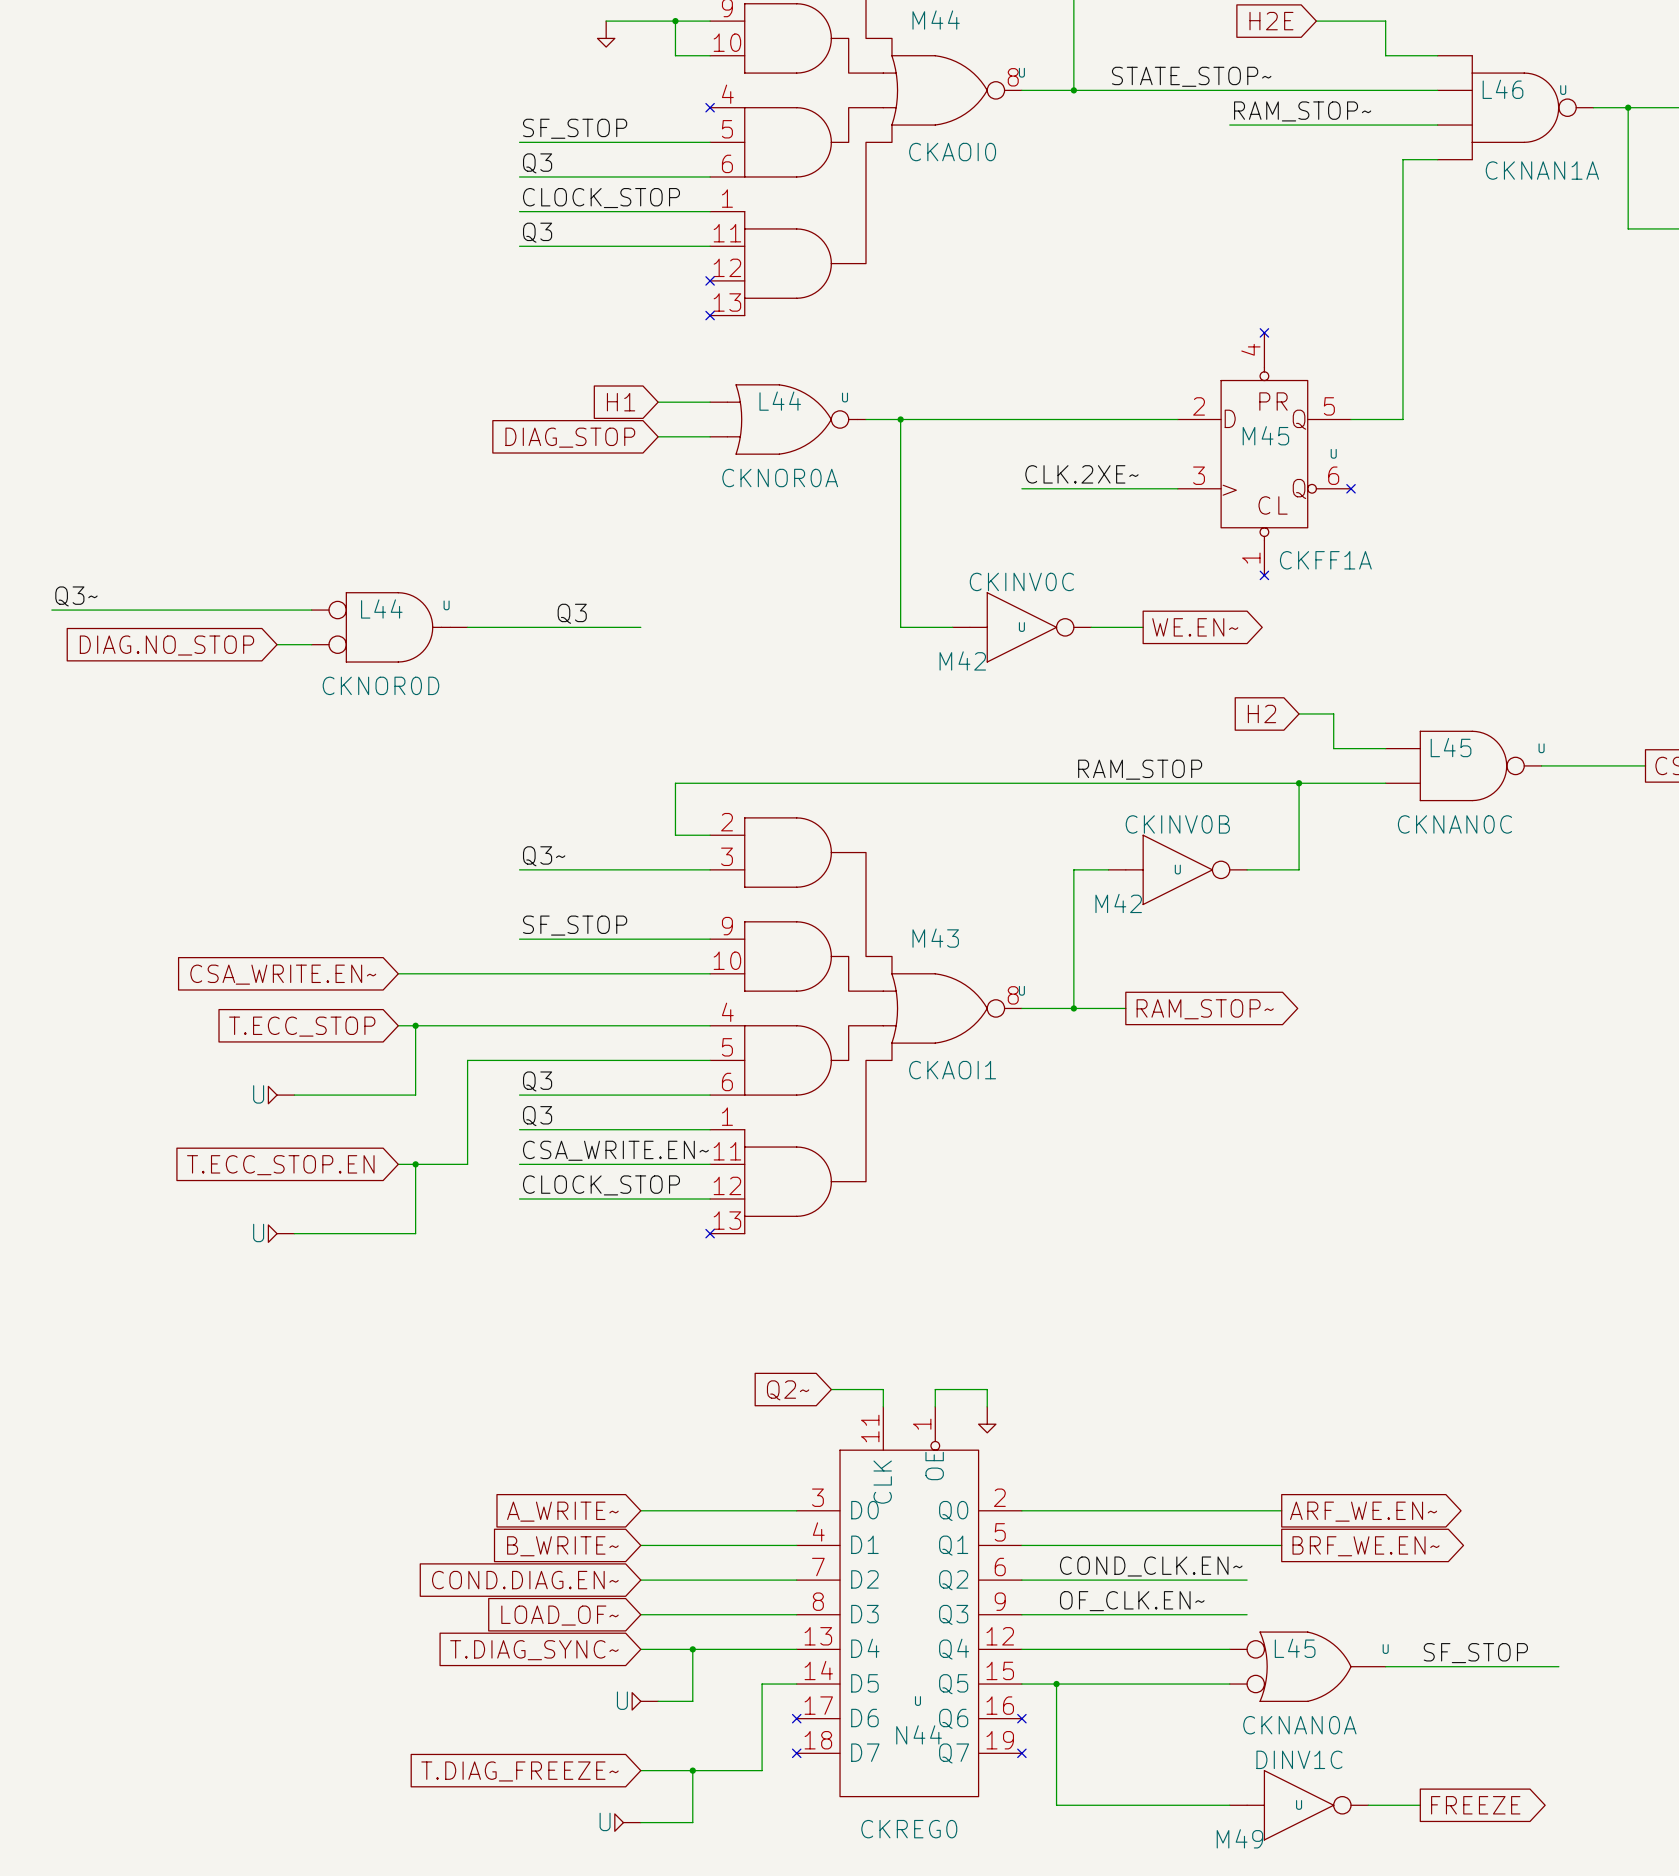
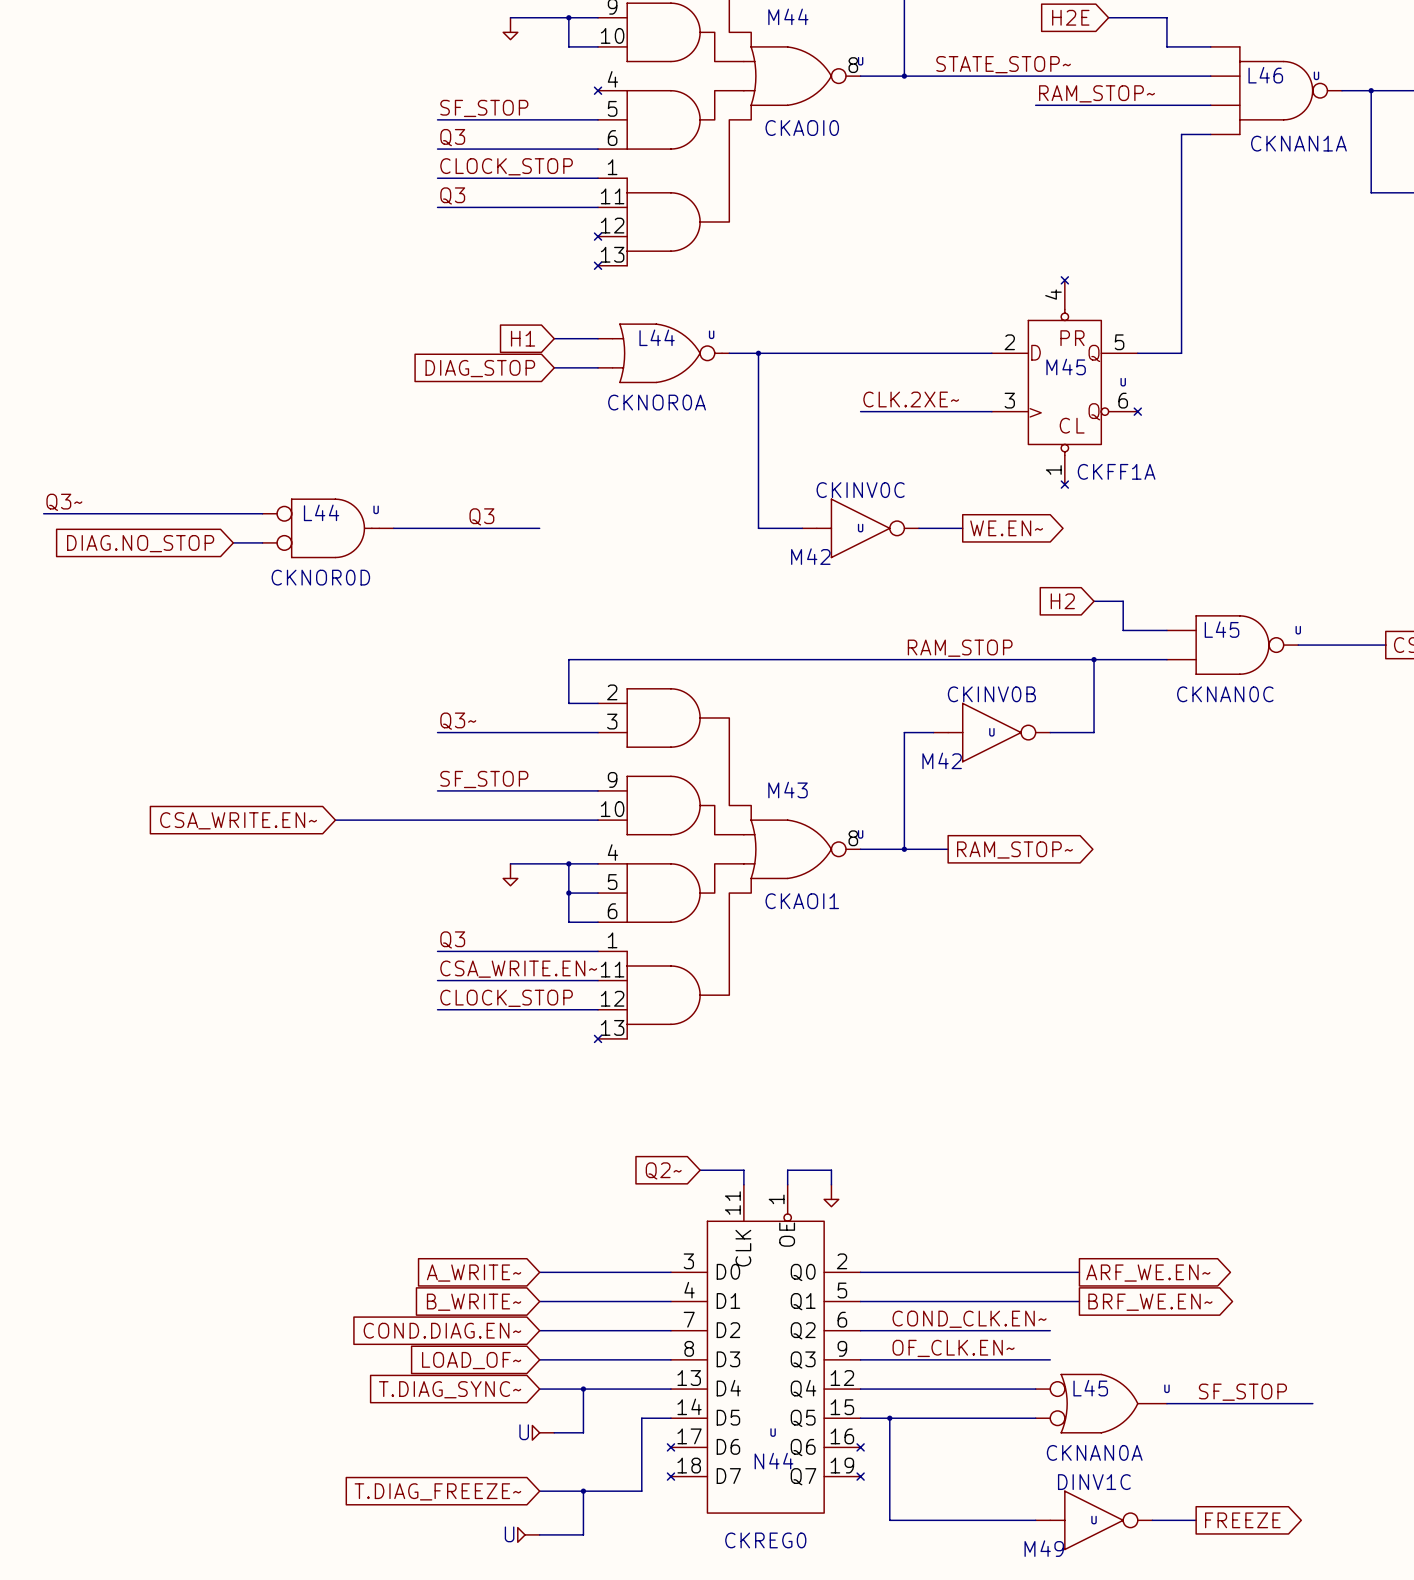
wire: (398, 1025) (606, 1025) -> none
wire: (415, 1025) (415, 1095) (294, 1095) -> none
junction: (415, 1025) -> none
junction: none -> (568, 863)
global label: T.ECC_STOP (302, 1026) -> none
power symbol: none -> (510, 875)
wire: (675, 1060) (467, 1060) (467, 1164) (398, 1164) -> none
junction: none -> (568, 893)
label: Q3 (537, 1081) -> none
U: (281, 1095) -> none
wire: (519, 1095) (675, 1095) -> (568, 863) (568, 922)
wire: (415, 1164) (415, 1233) (294, 1233) -> none
junction: (415, 1164) -> none
global label: T.ECC_STOP.EN (280, 1165) -> none
U: (281, 1233) -> none

